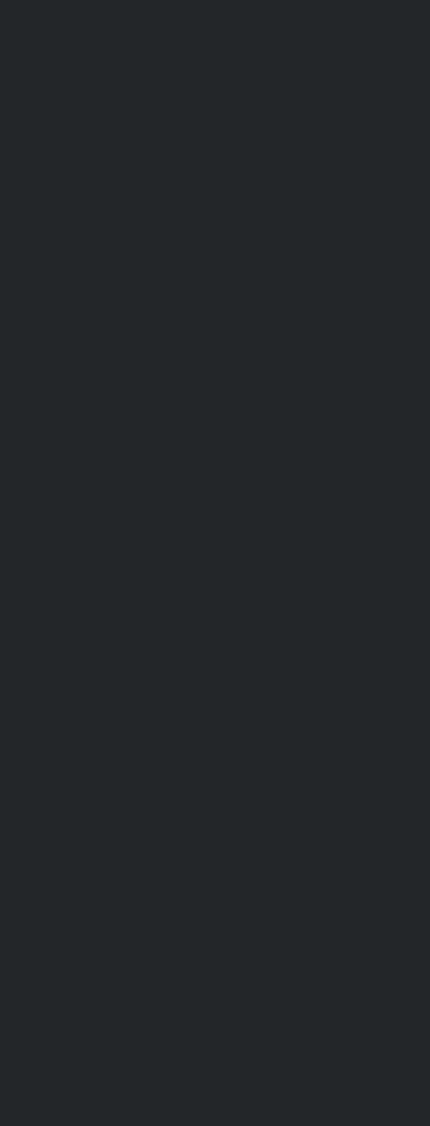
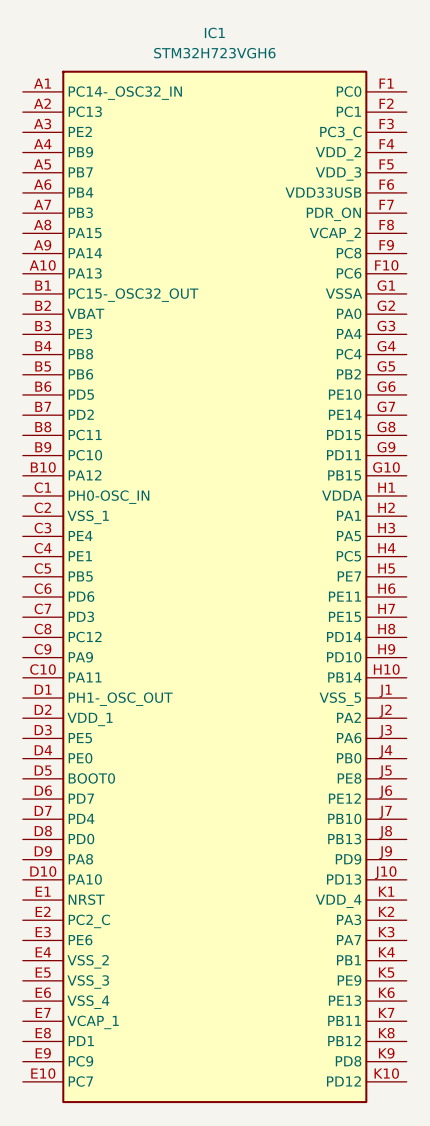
IC1: none -> STM32H723VGH6 (214, 586)

